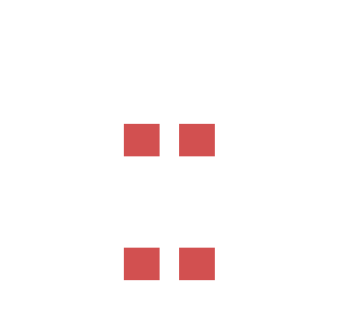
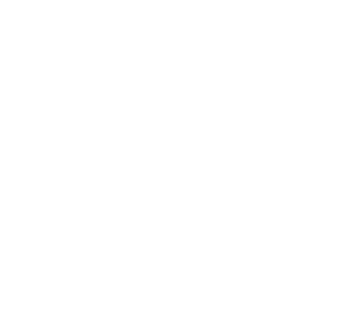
part: (169, 140) -> none
part: (169, 263) -> none

